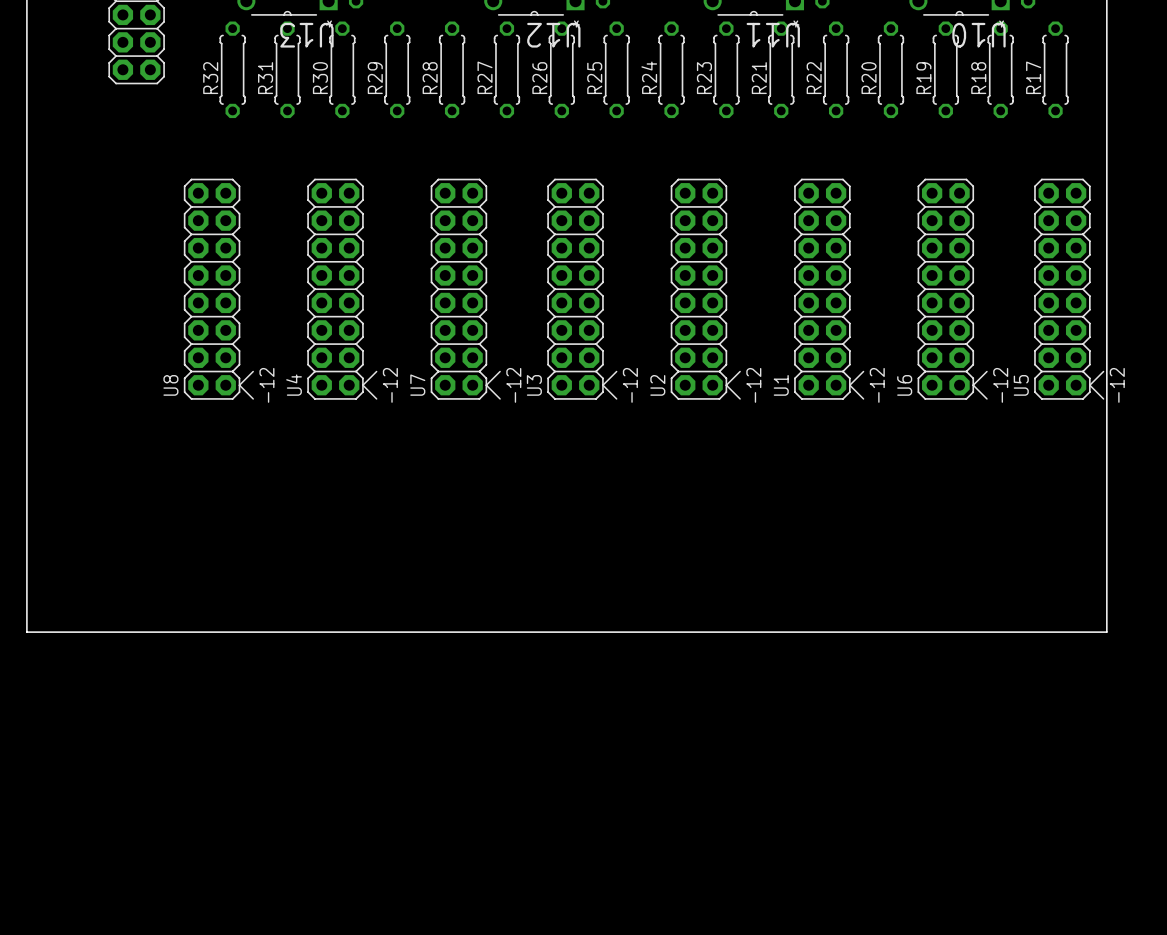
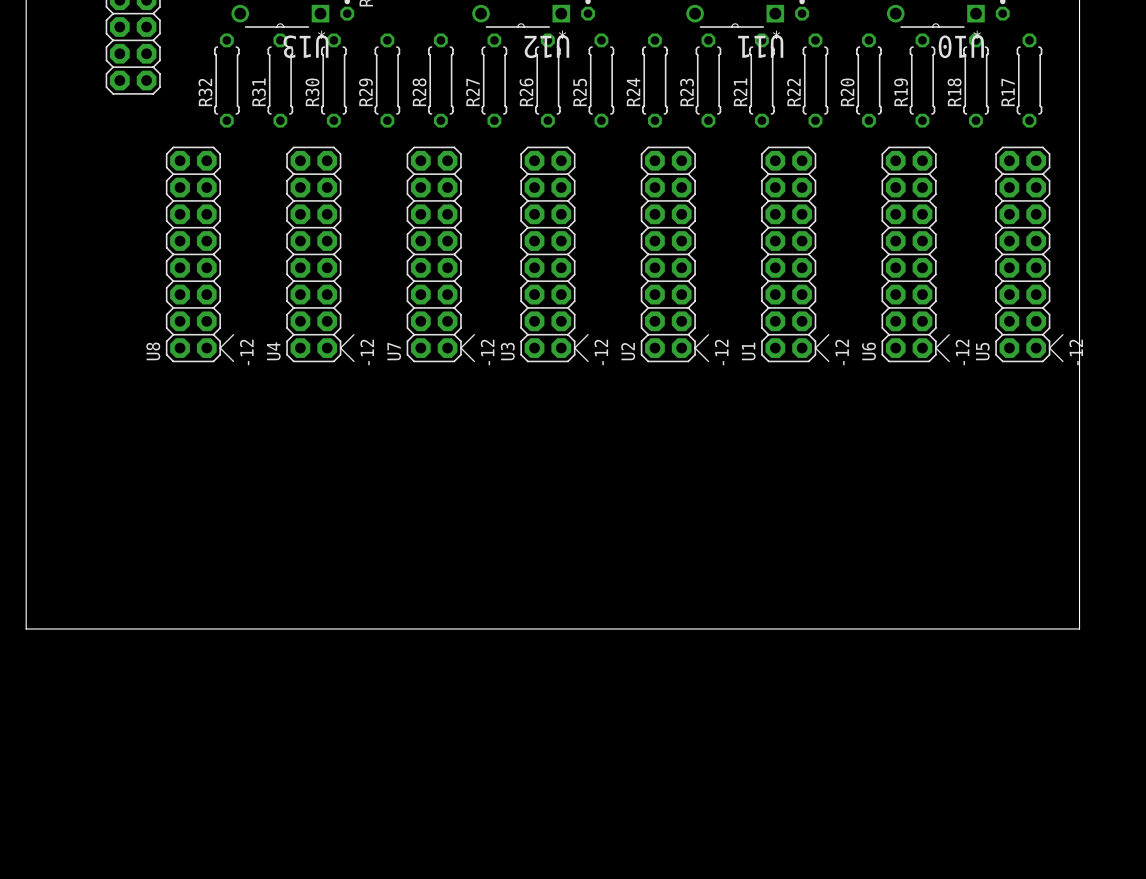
U8 position: (218, 289) -> (200, 254)
U4 position: (342, 289) -> (320, 254)
U7 position: (465, 289) -> (440, 254)
U3 position: (582, 289) -> (554, 254)
U2 position: (705, 289) -> (674, 254)
U1 position: (829, 289) -> (795, 254)
U6 position: (952, 289) -> (915, 254)
U5 position: (1069, 289) -> (1029, 254)

